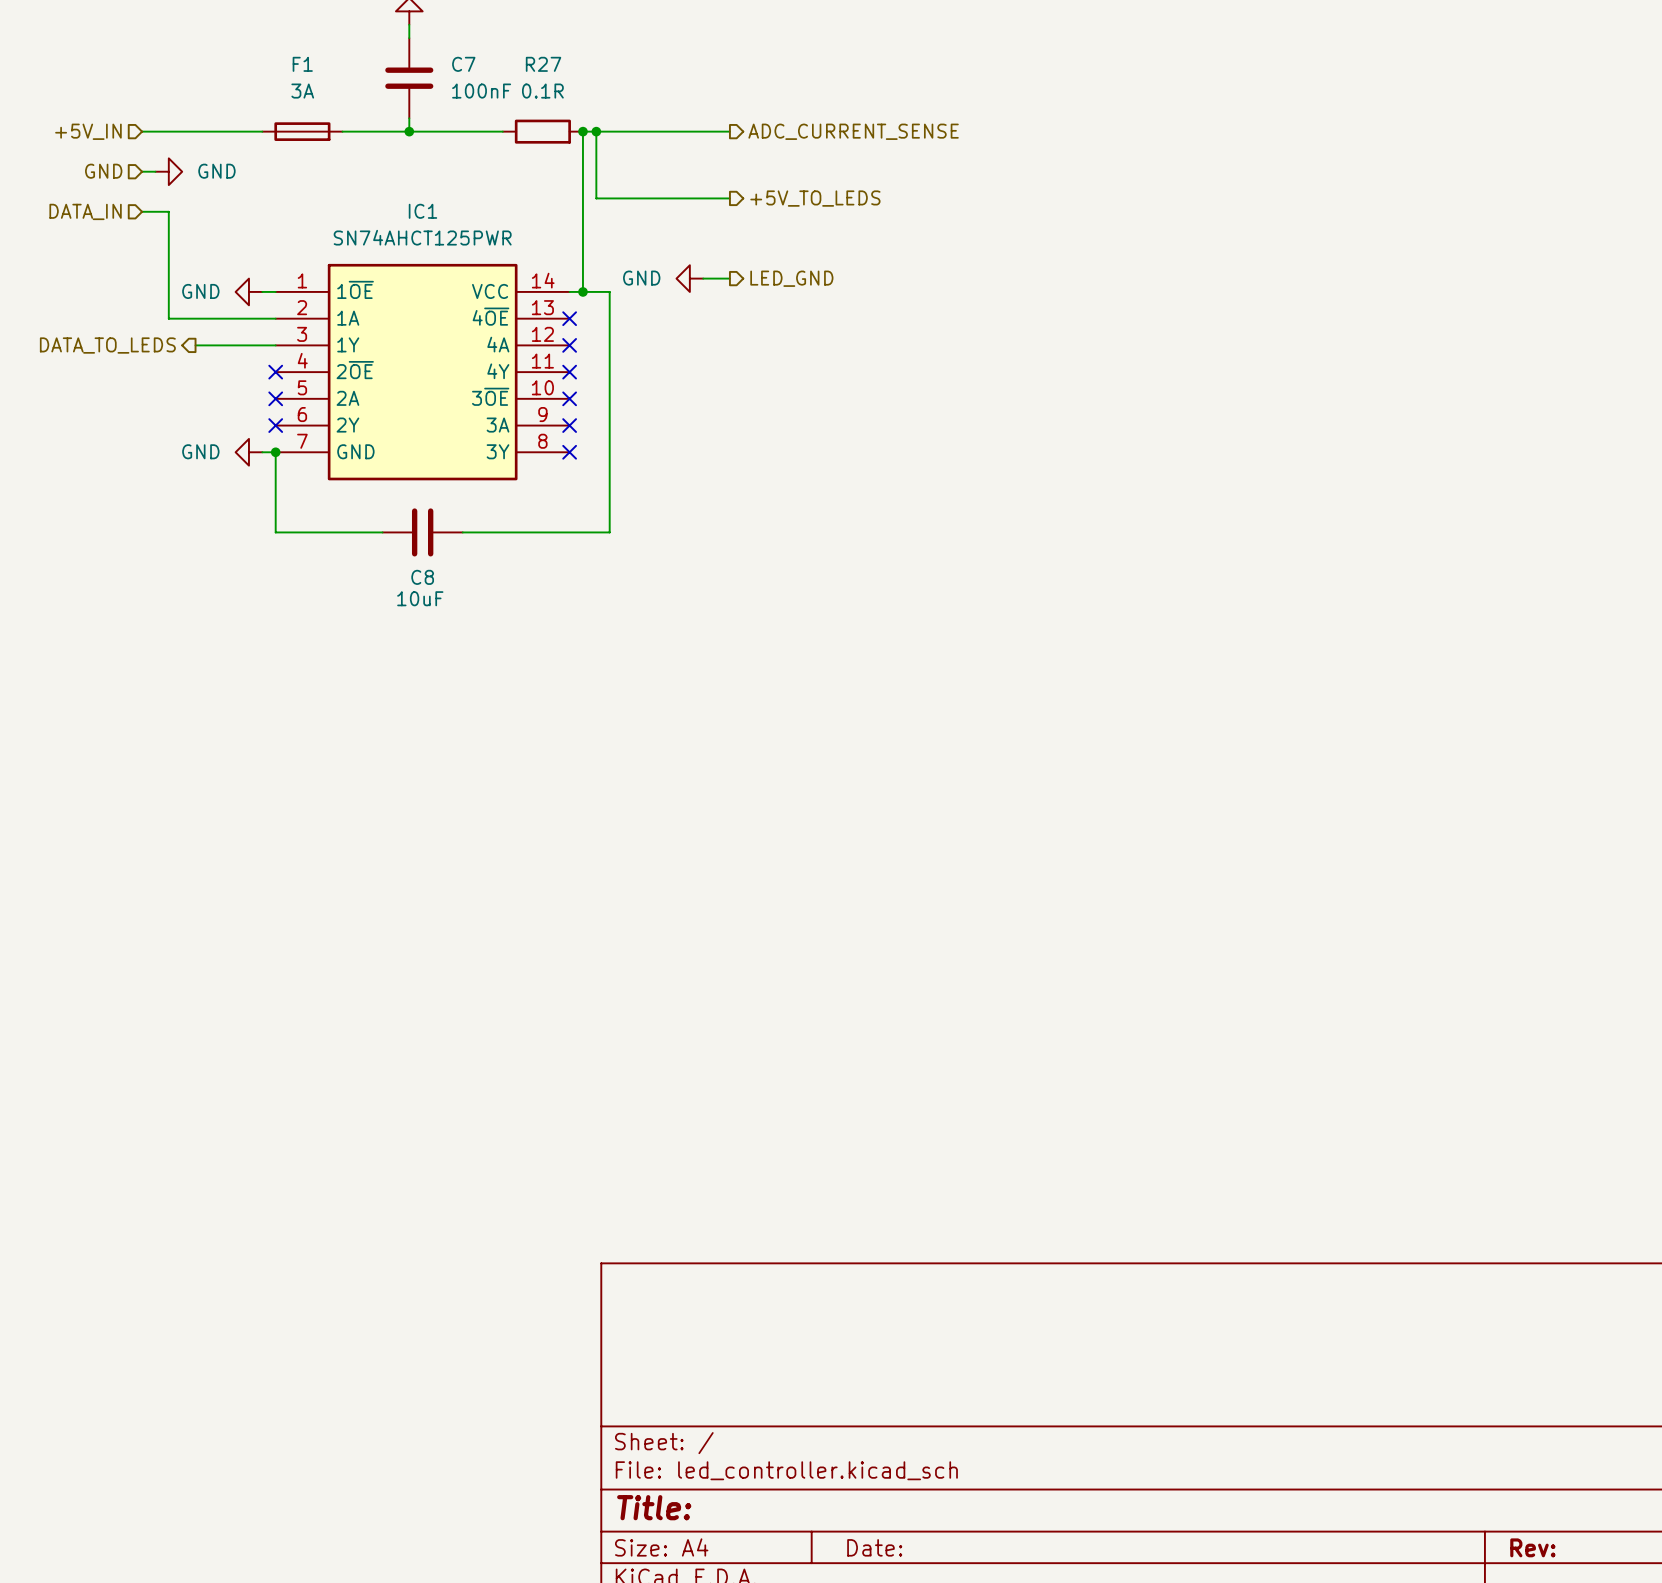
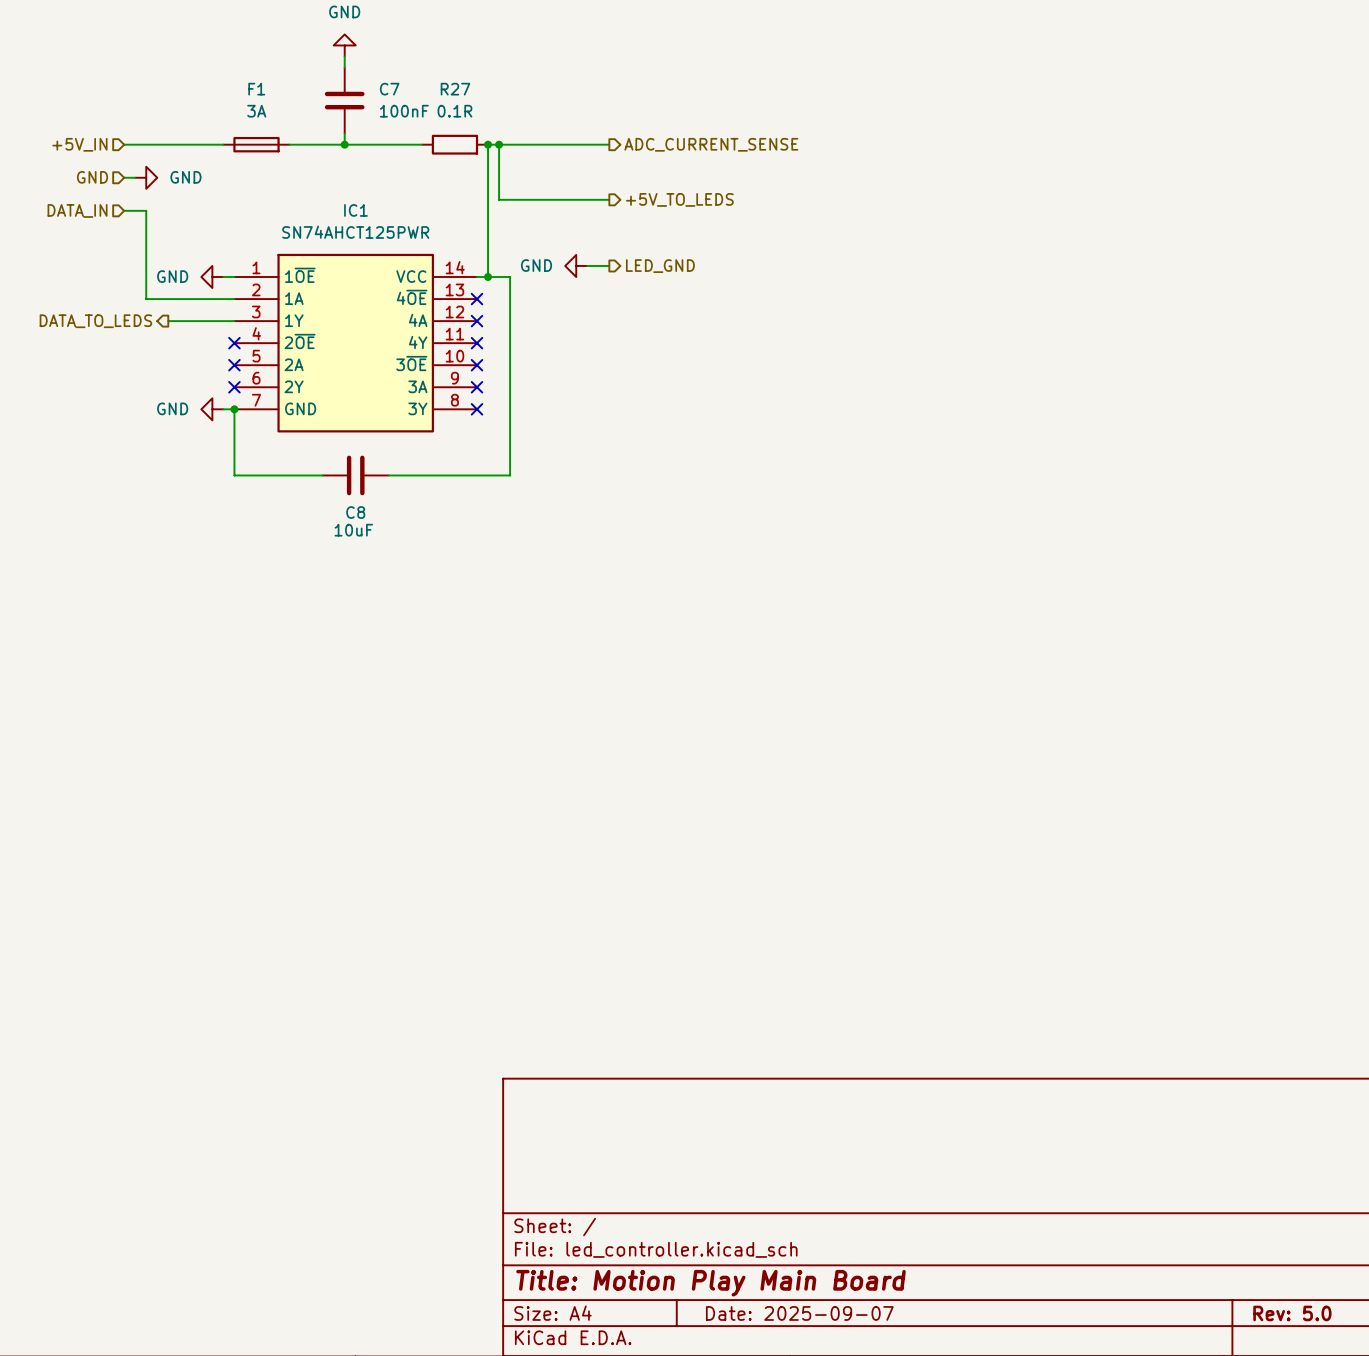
title block: Title: (654, 1507) -> Title: Motion Play Main Board (711, 1283)
title block: Date: (874, 1547) -> Date: 2025-09-07 (799, 1313)
title block: Rev: (1532, 1547) -> Rev: 5.0 (1292, 1313)

